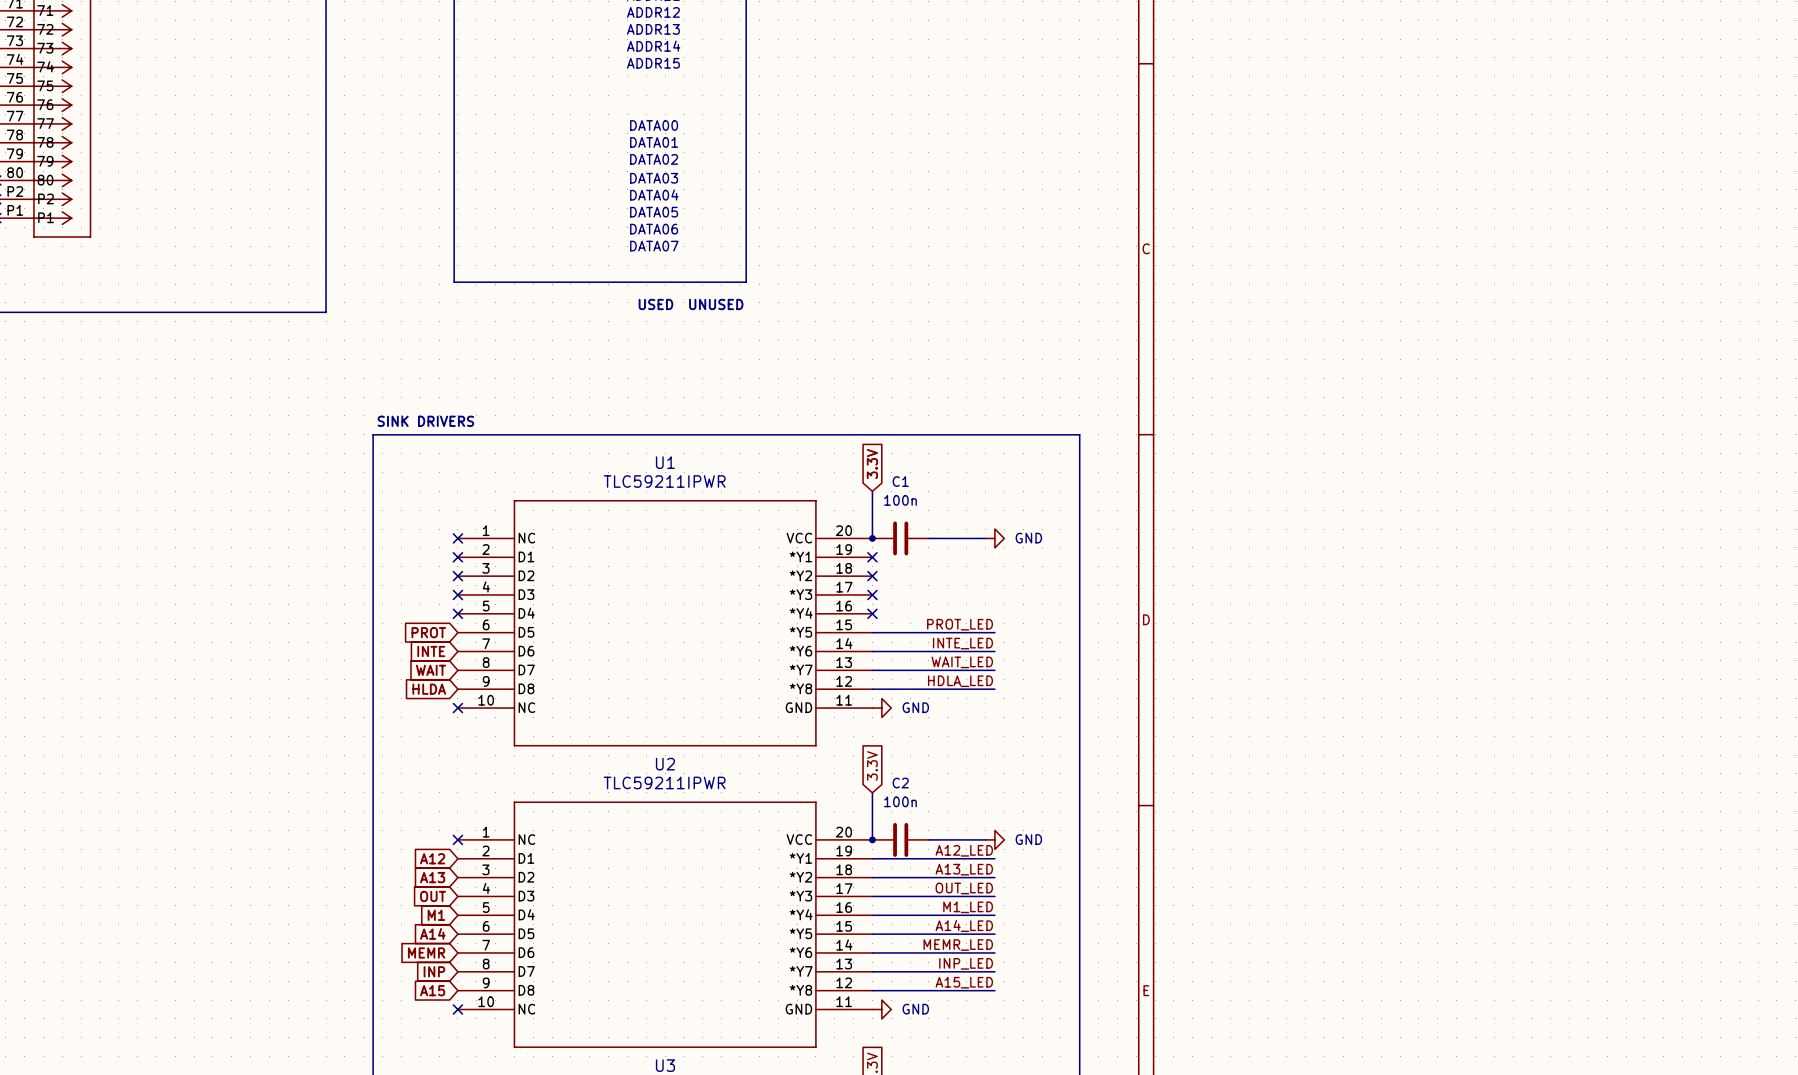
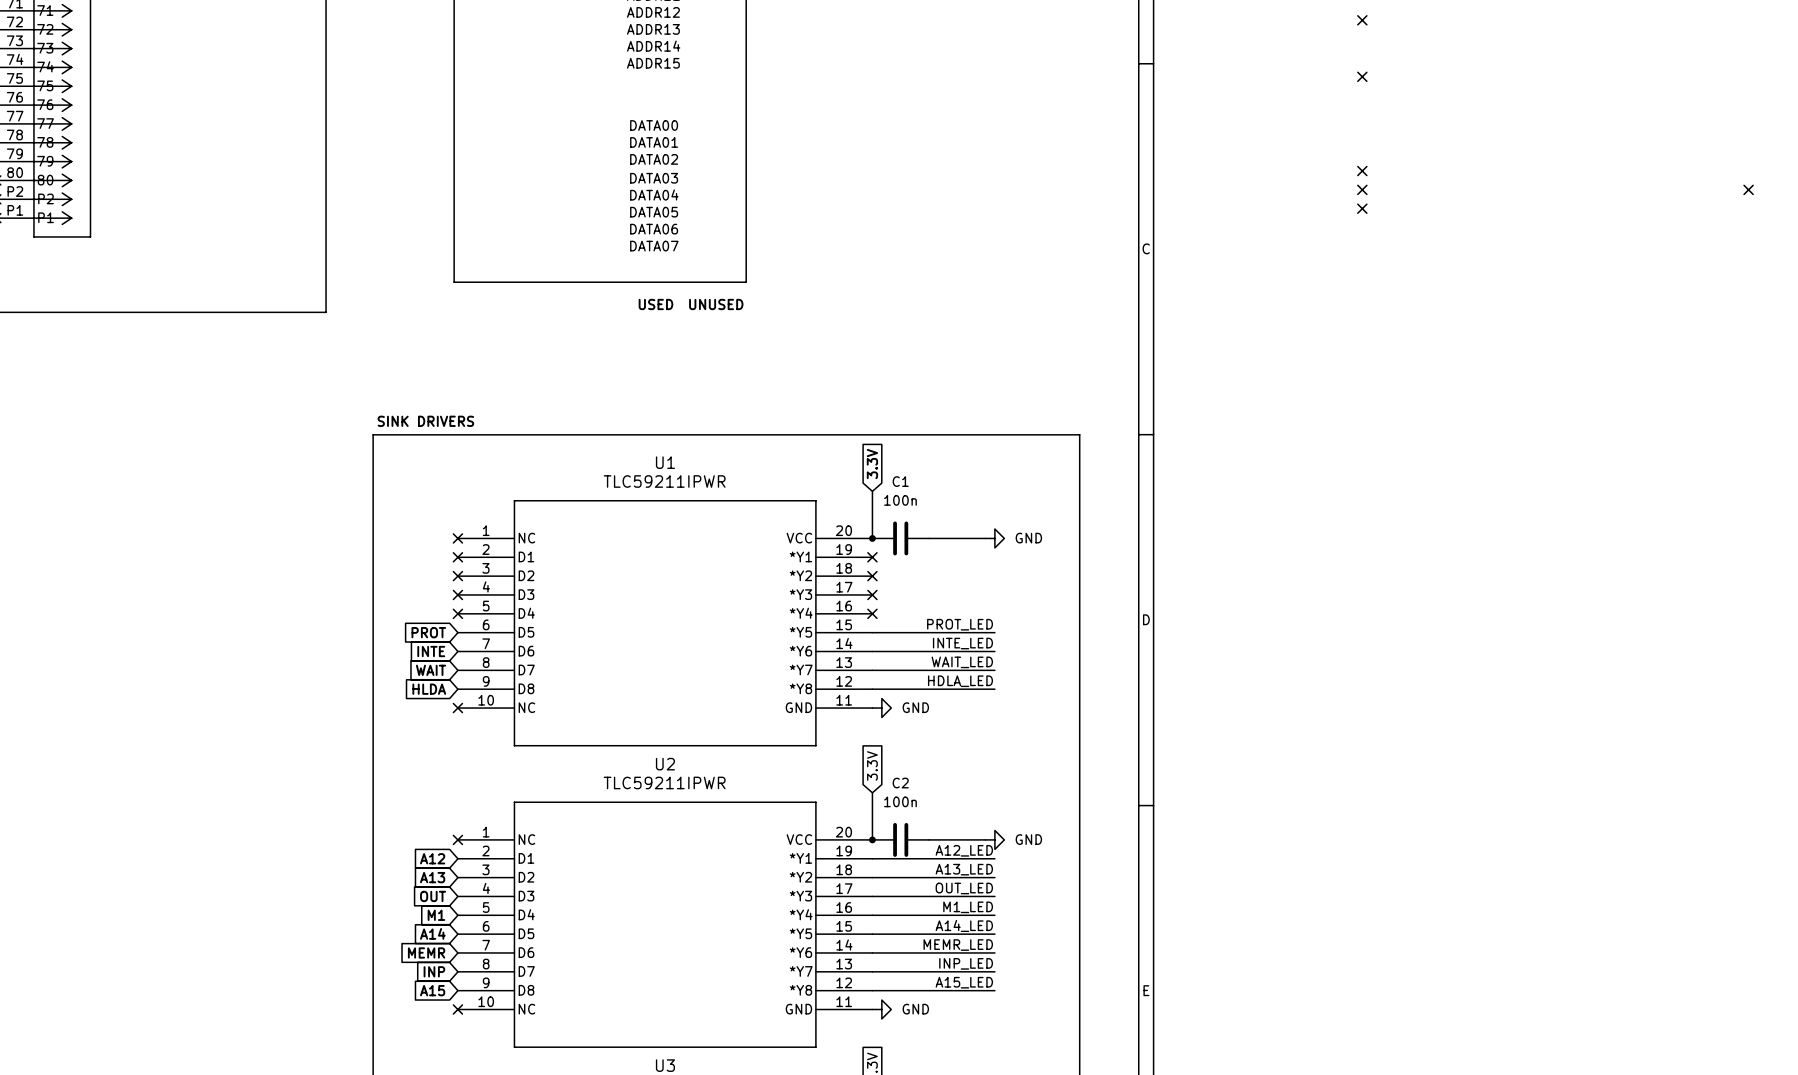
no-connect mark: none -> (1362, 20)
no-connect mark: none -> (1362, 76)
no-connect mark: none -> (1362, 171)
no-connect mark: none -> (1362, 189)
no-connect mark: none -> (1748, 189)
no-connect mark: none -> (1362, 208)

